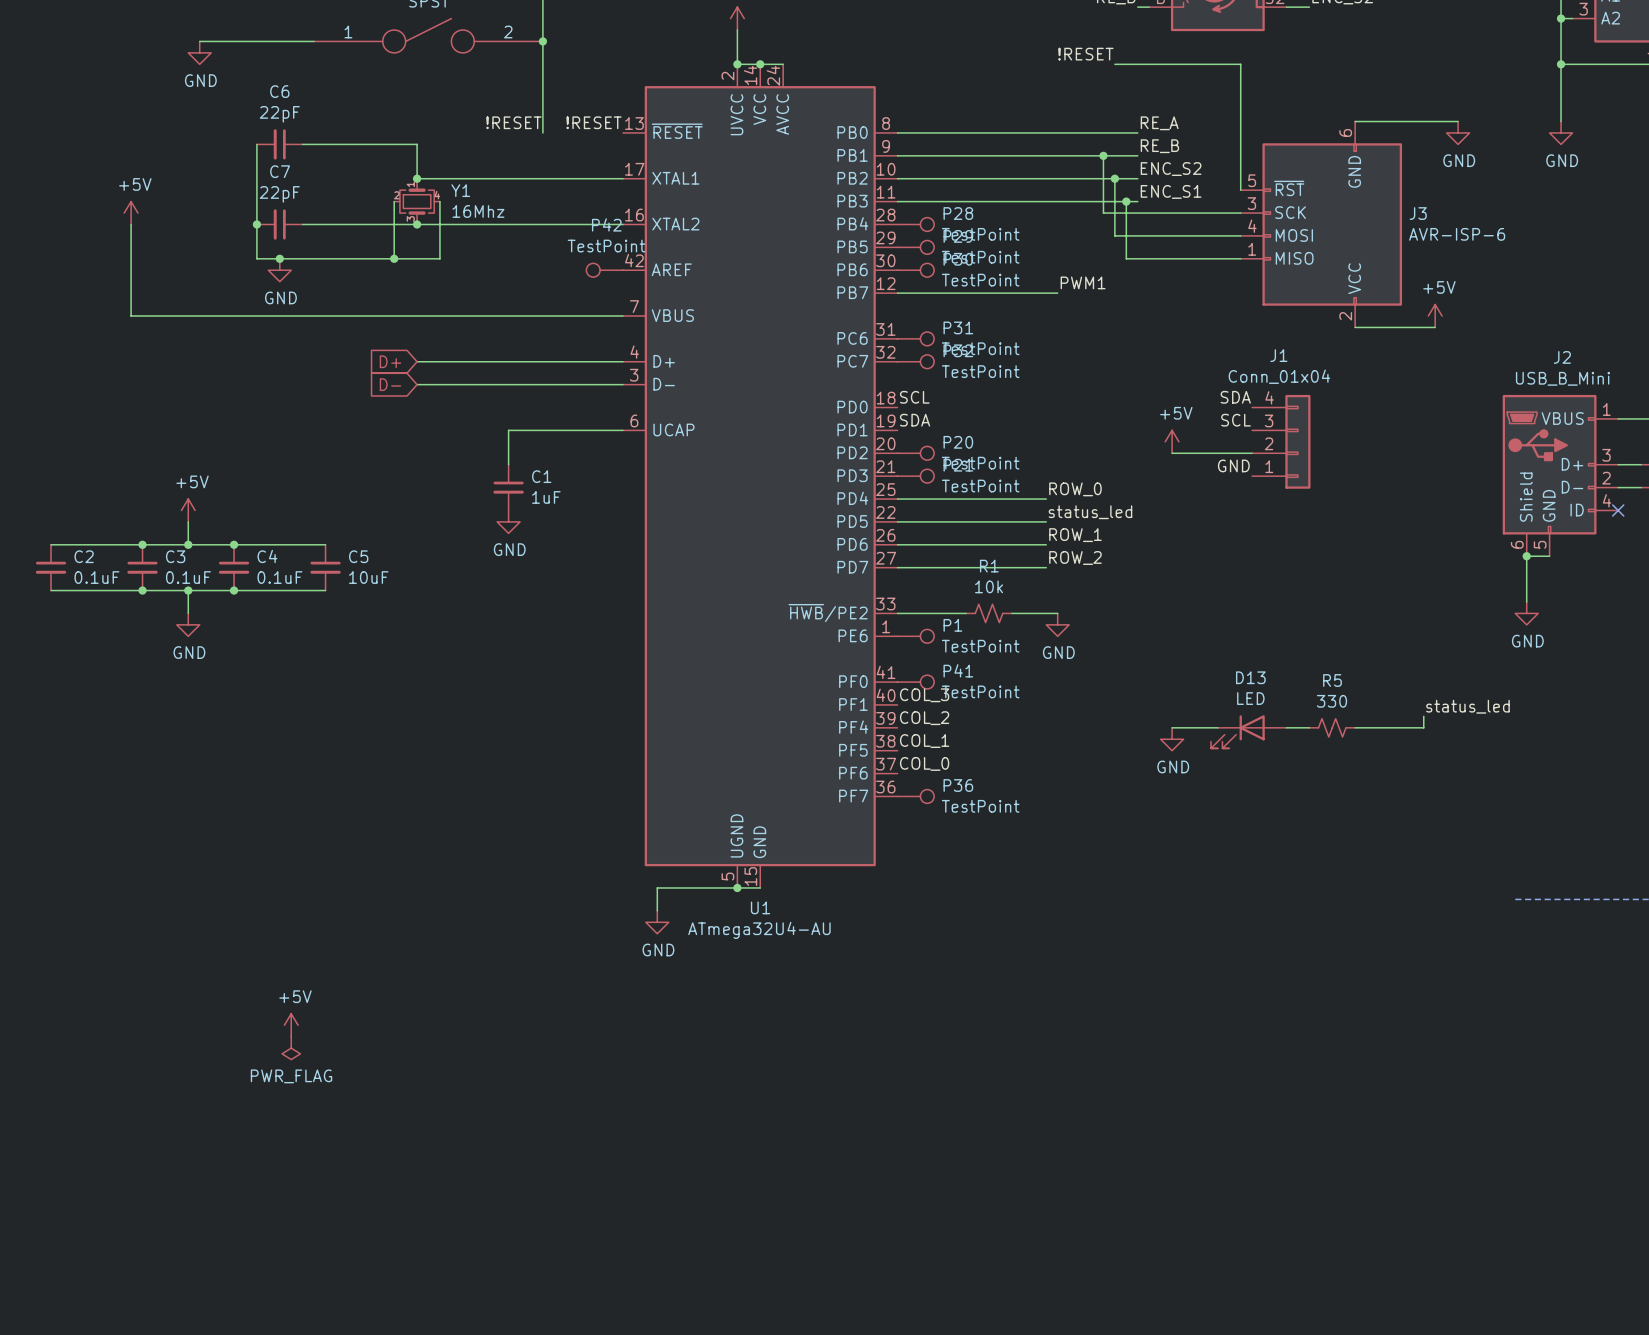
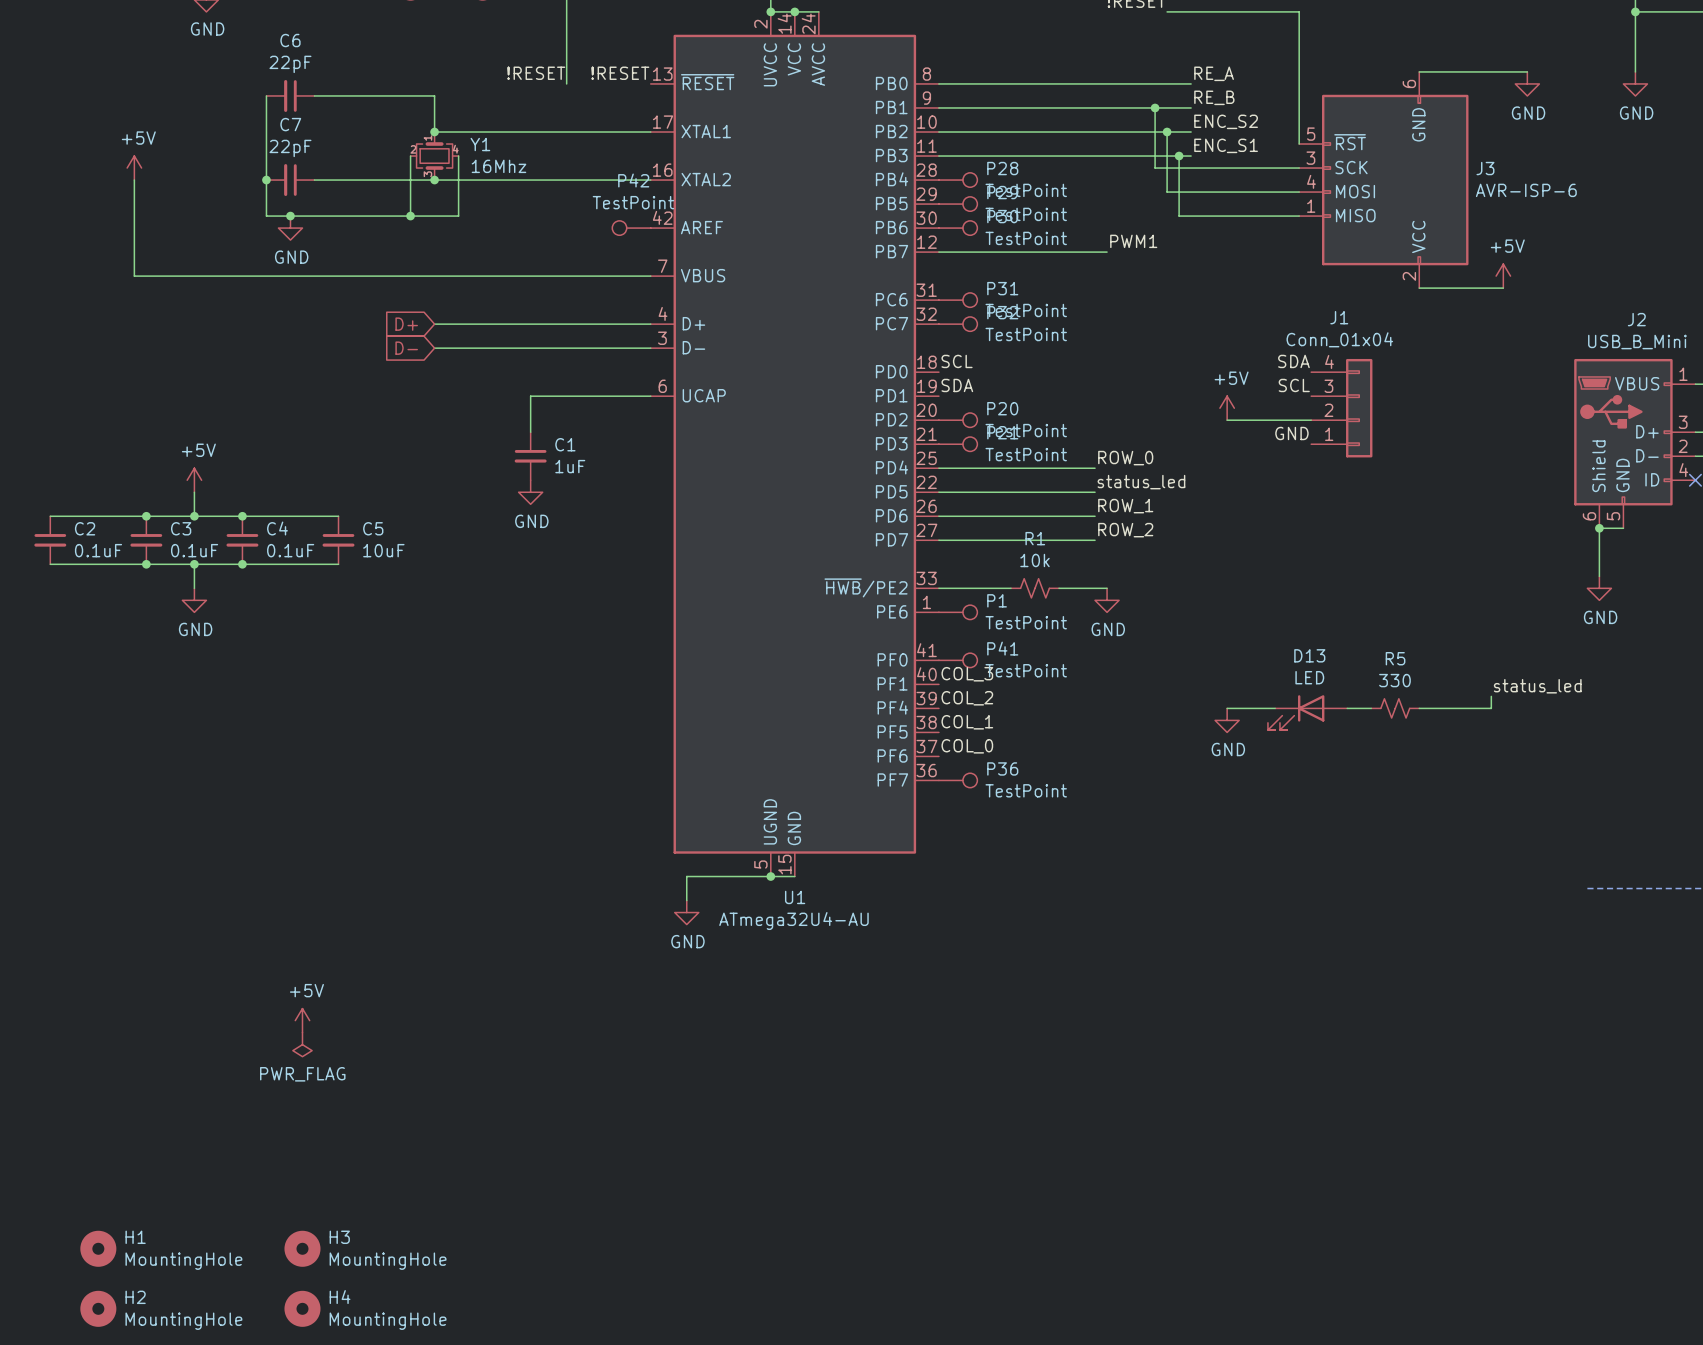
H1: none -> MountingHole (98, 1248)
H3: none -> MountingHole (302, 1248)
H2: none -> MountingHole (98, 1308)
H4: none -> MountingHole (302, 1308)

